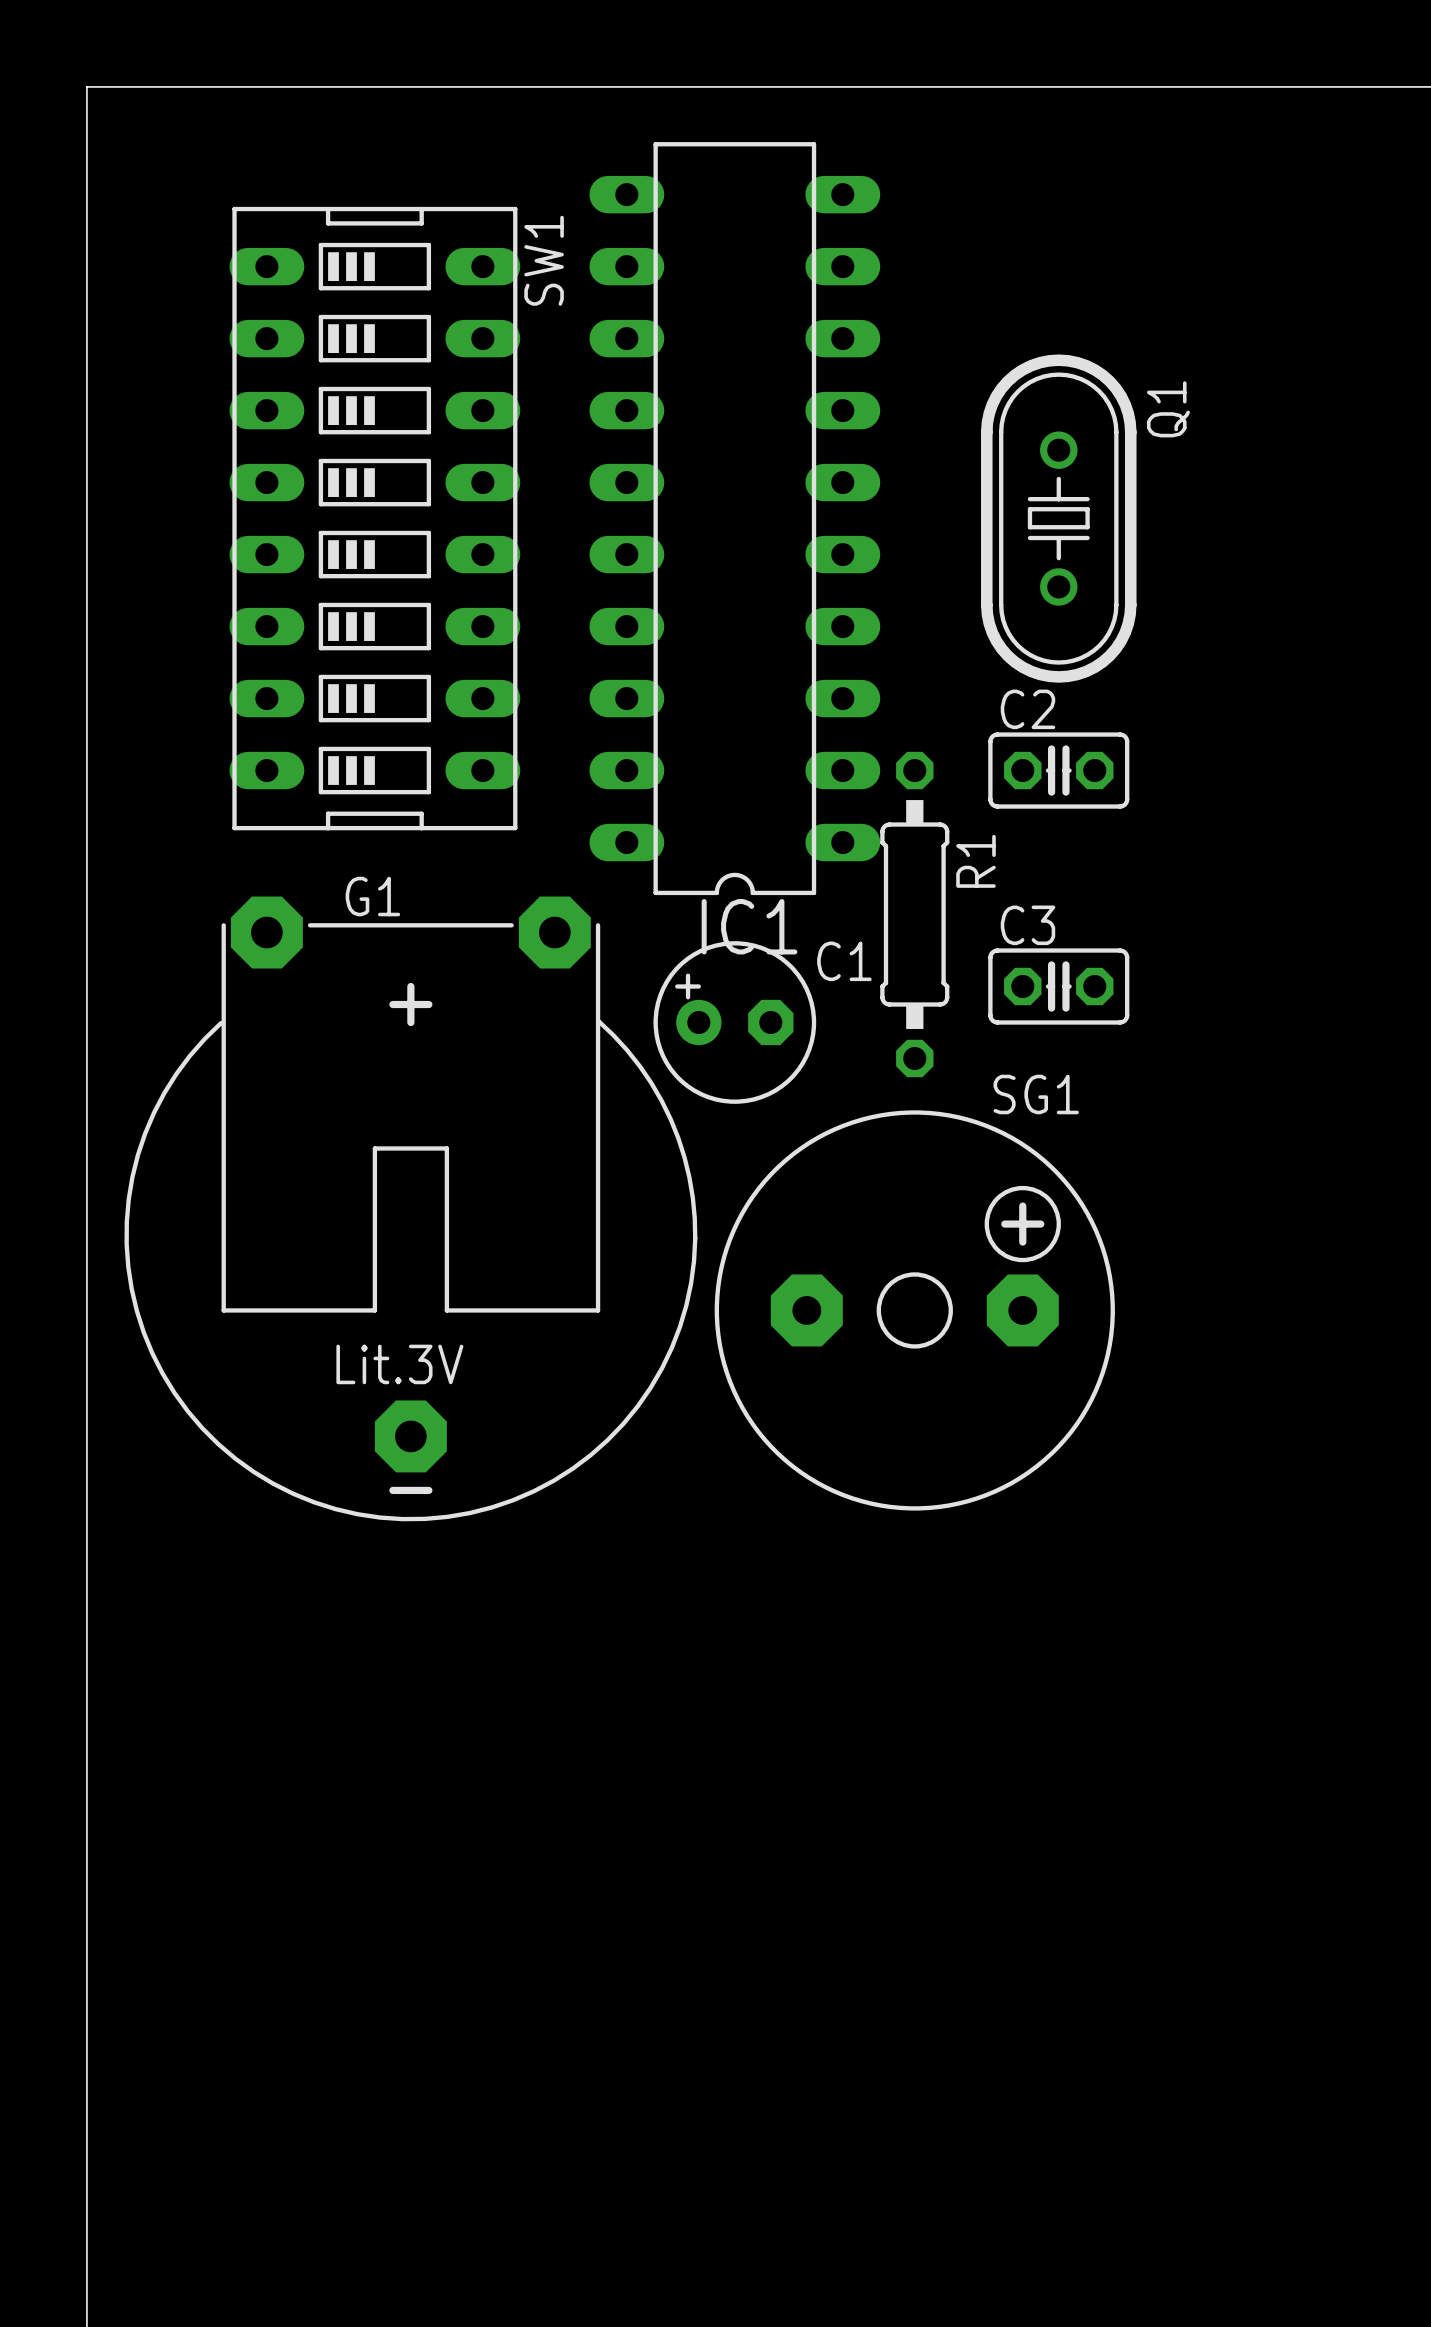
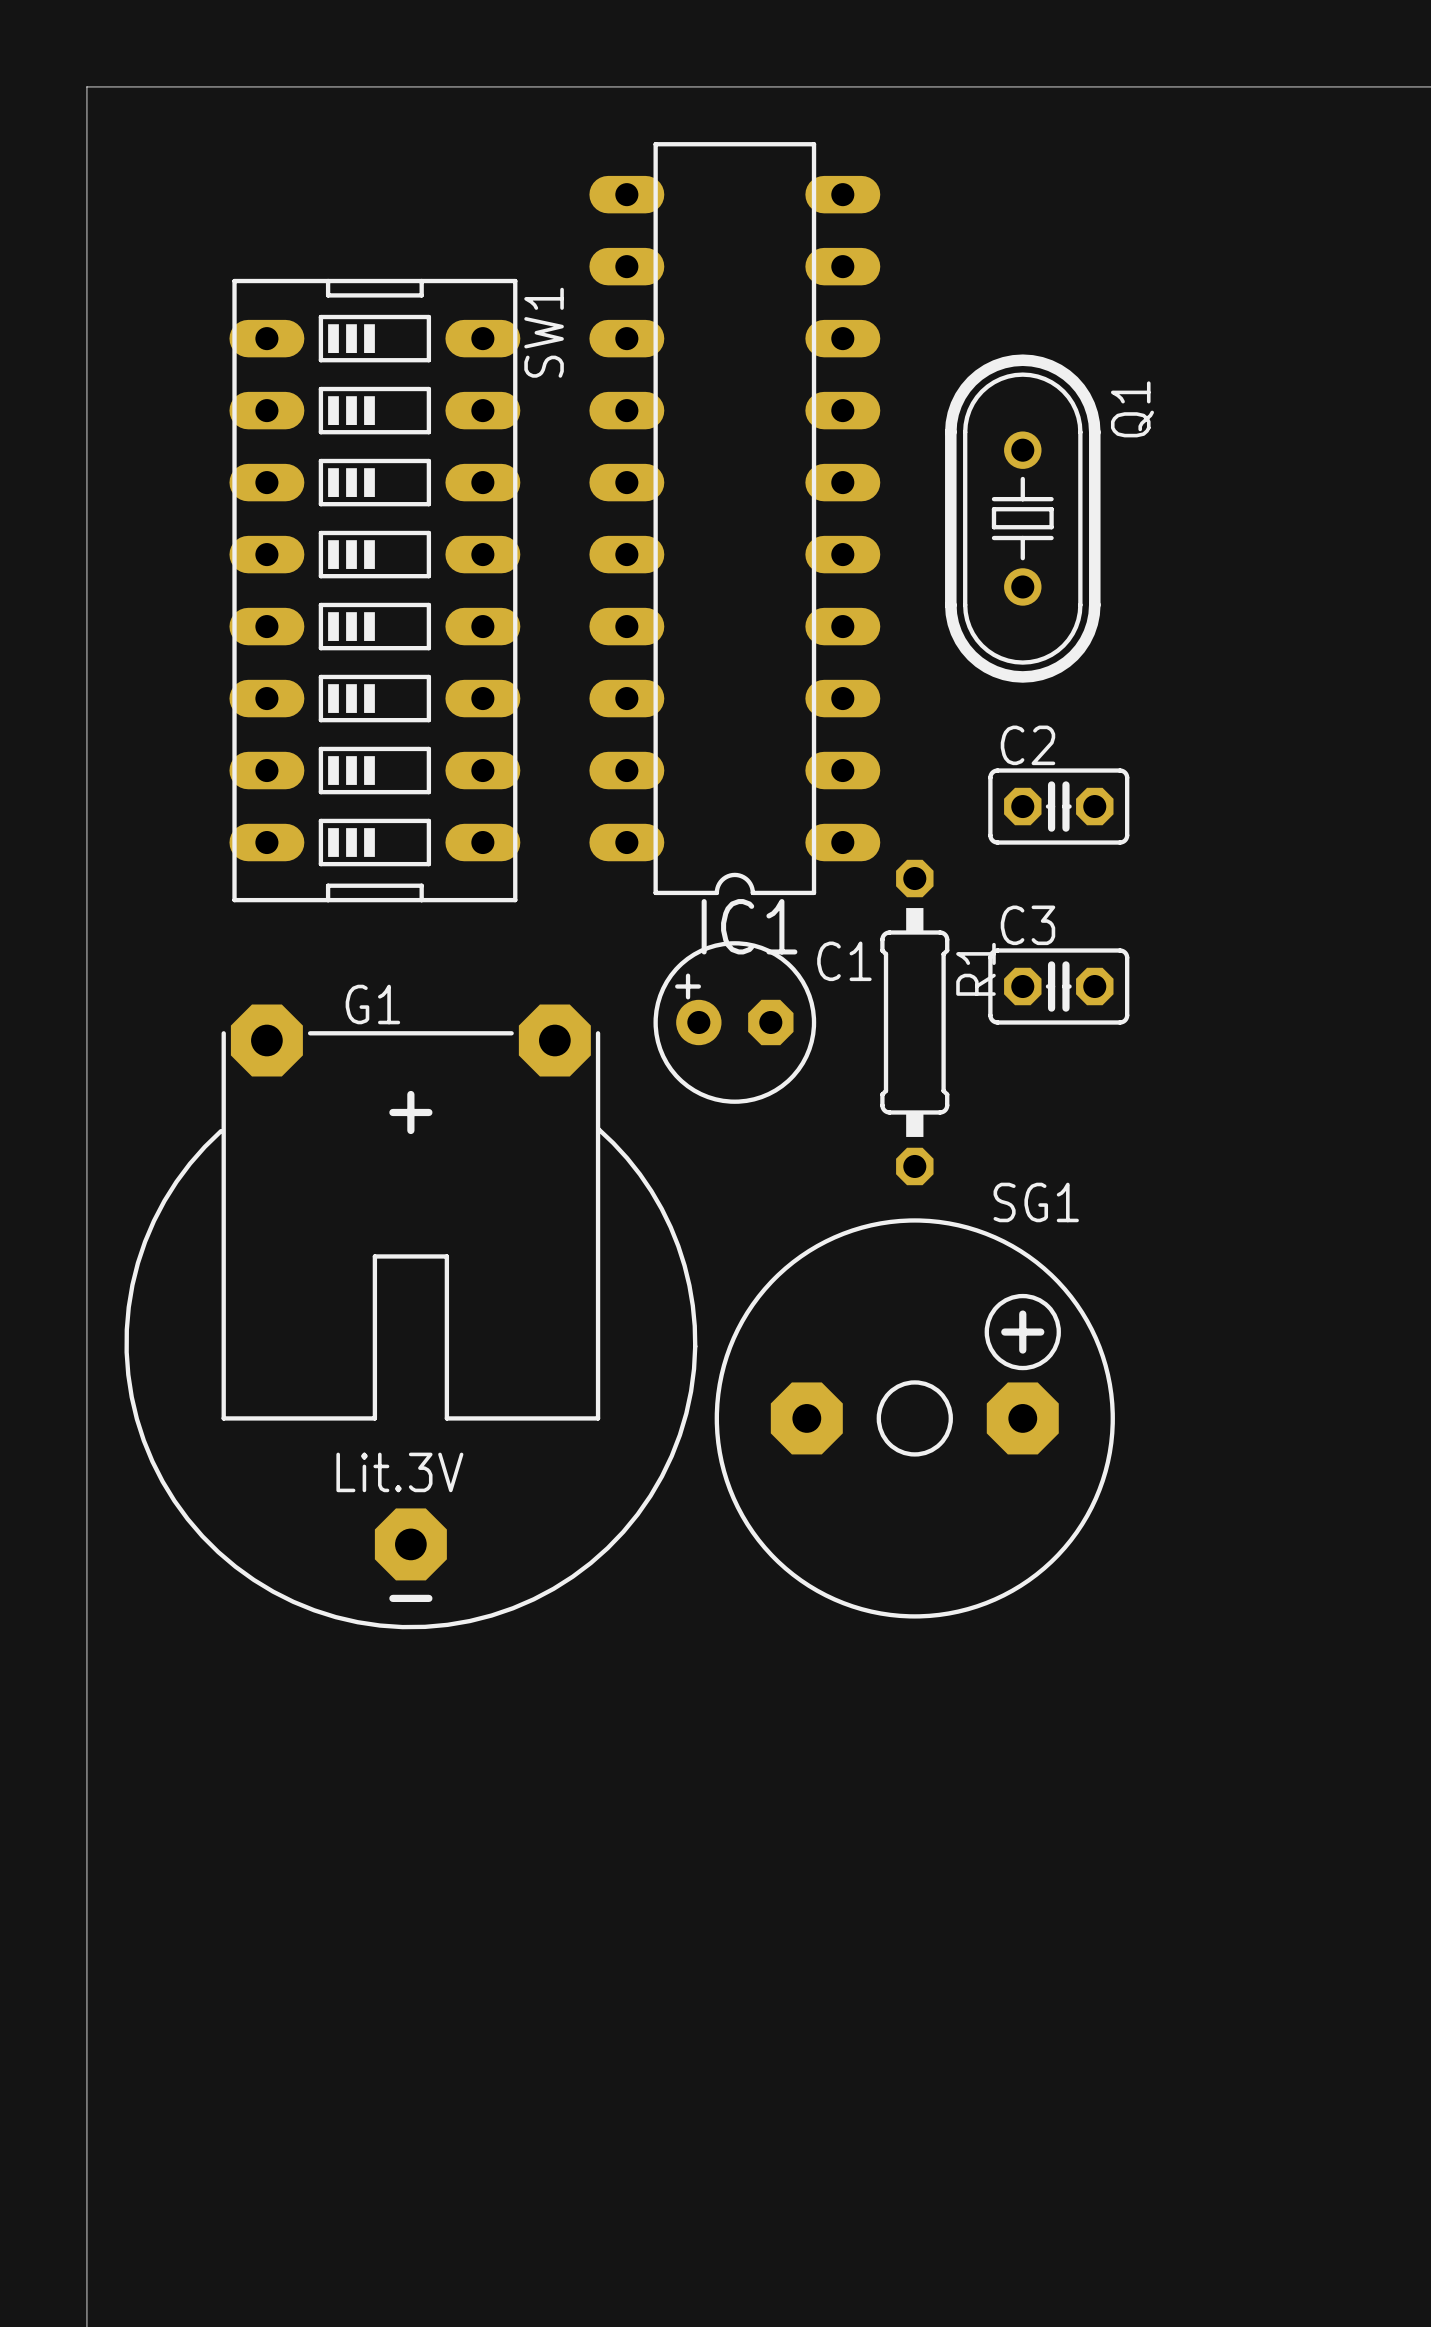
SW1 position: (374, 518) -> (374, 590)
Q1 position: (1058, 518) -> (1022, 518)
C2 position: (1058, 770) -> (1058, 806)
R1 position: (914, 914) -> (914, 1022)
G1 position: (410, 1208) -> (410, 1316)
SG1 position: (914, 1310) -> (914, 1418)

